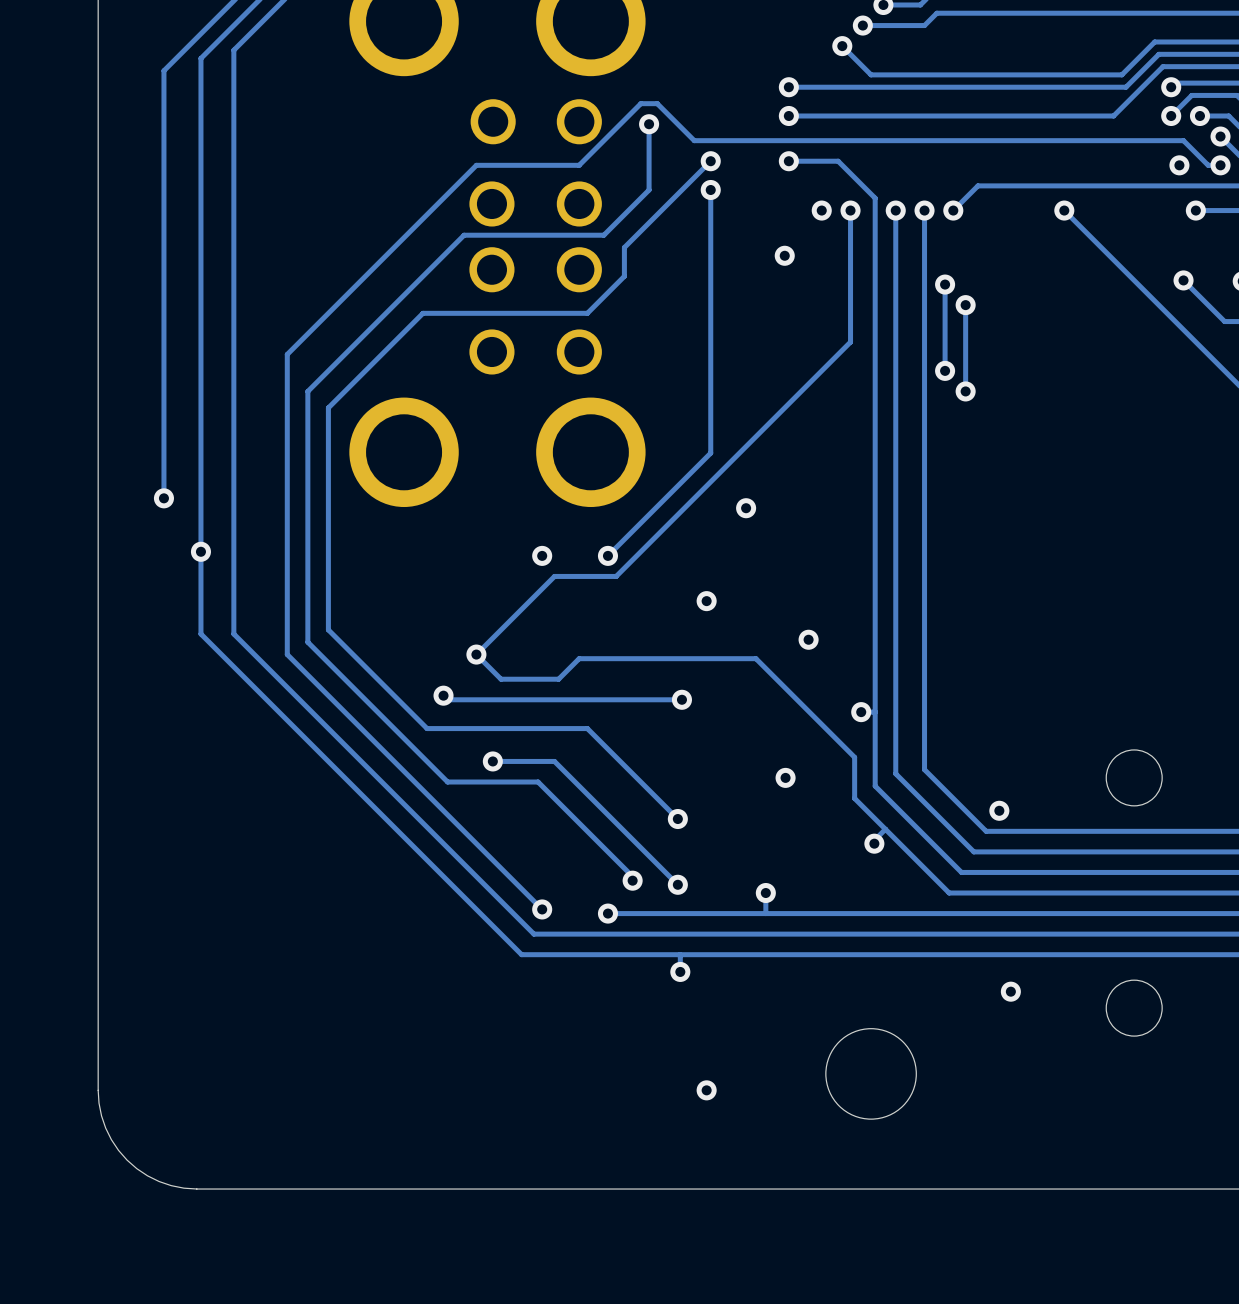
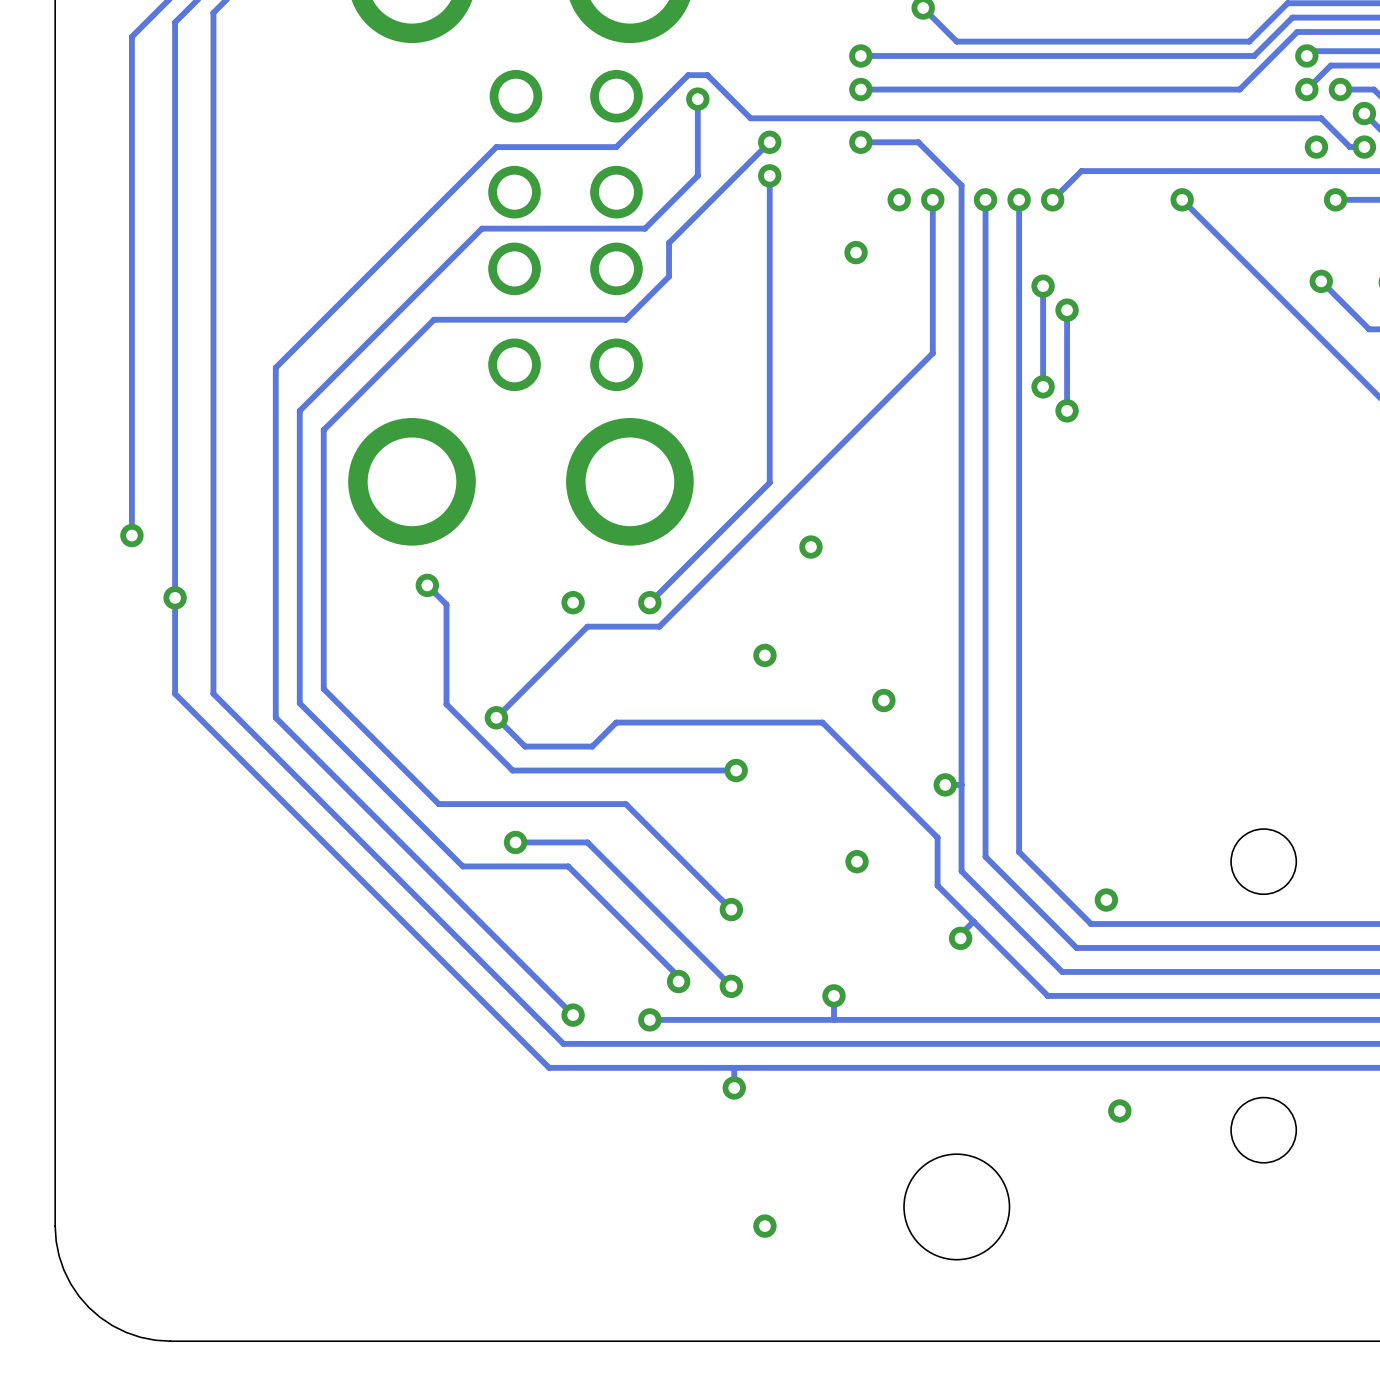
track: (443, 695) (447, 699) (490, 699) -> (427, 585) (446, 604) (446, 704) (512, 770)
via position: (443, 695) -> (427, 585)

